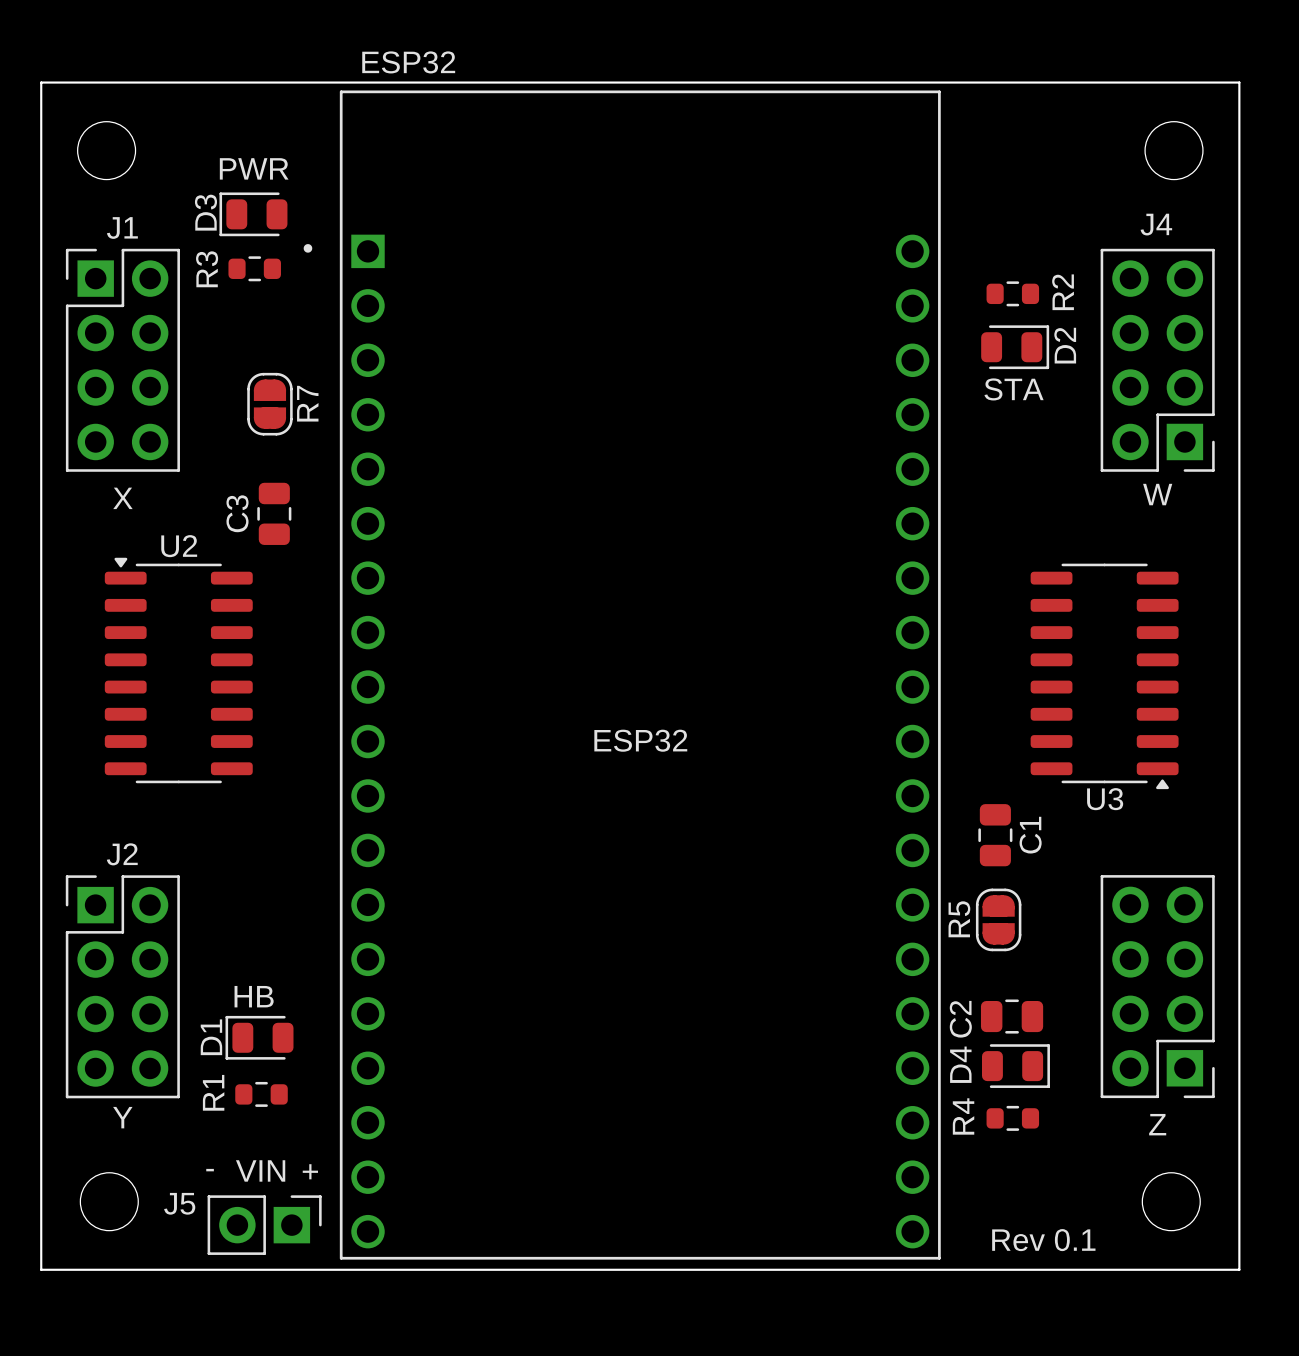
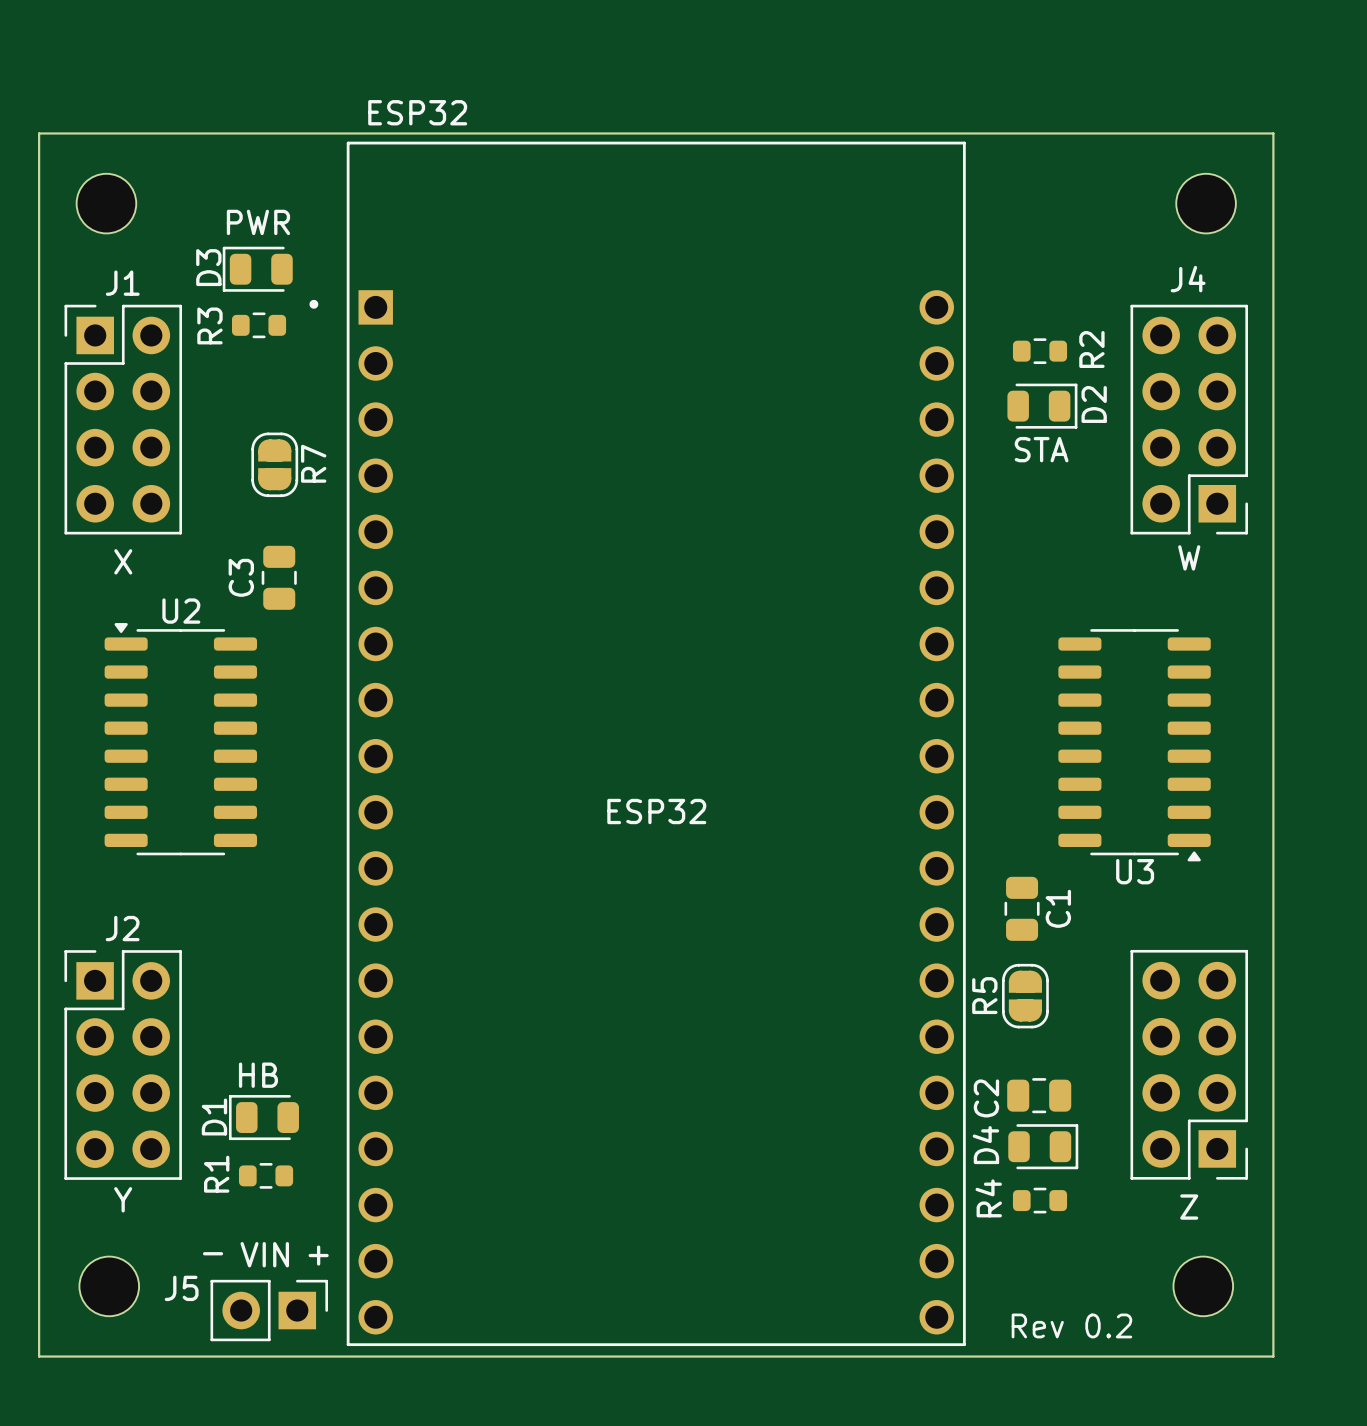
text: Rev 0.1 (1043, 1240) -> Rev 0.2 (1071, 1325)

